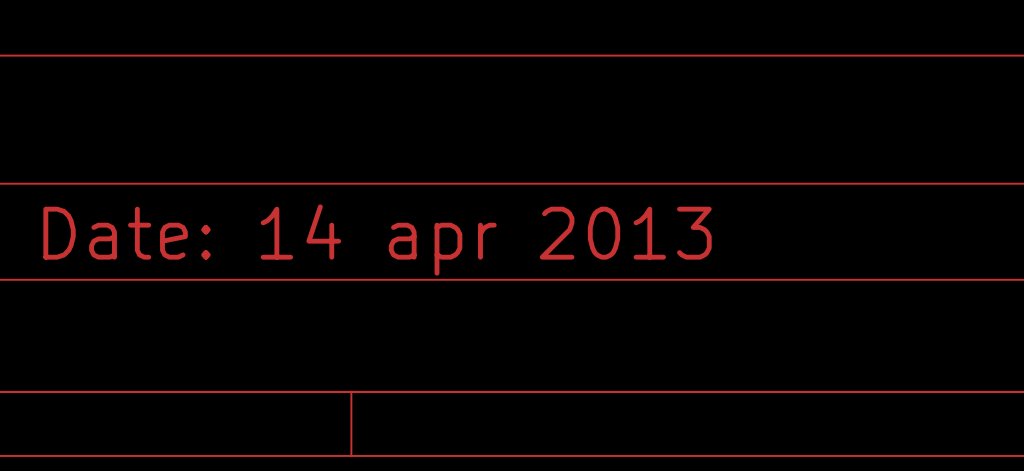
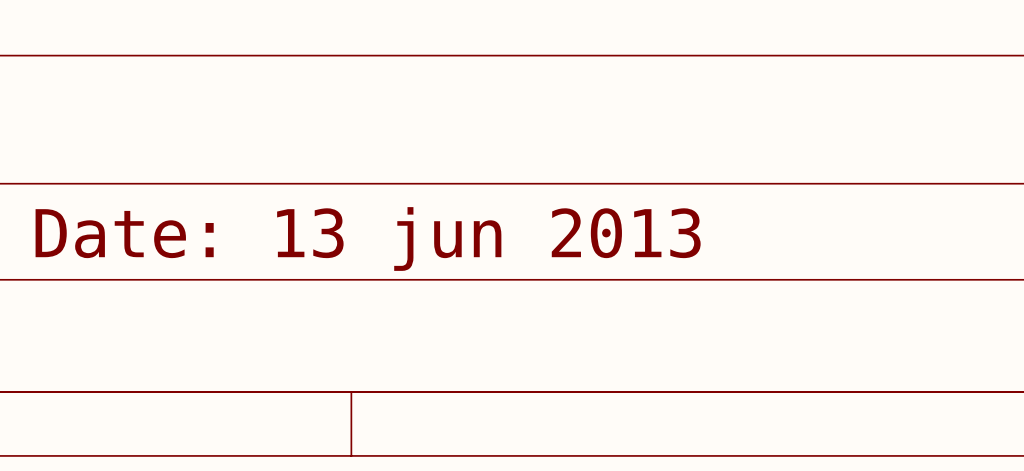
title block: Date: 14 apr 2013 (377, 240) -> Date: 13 jun 2013 (368, 239)

